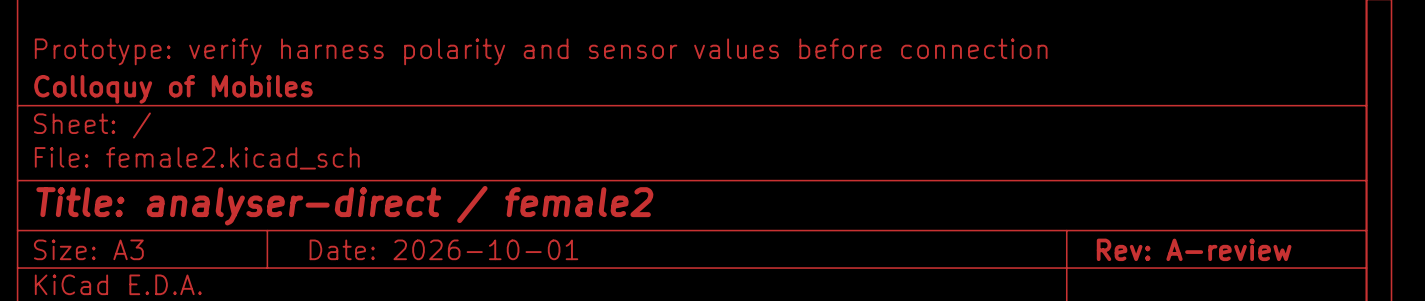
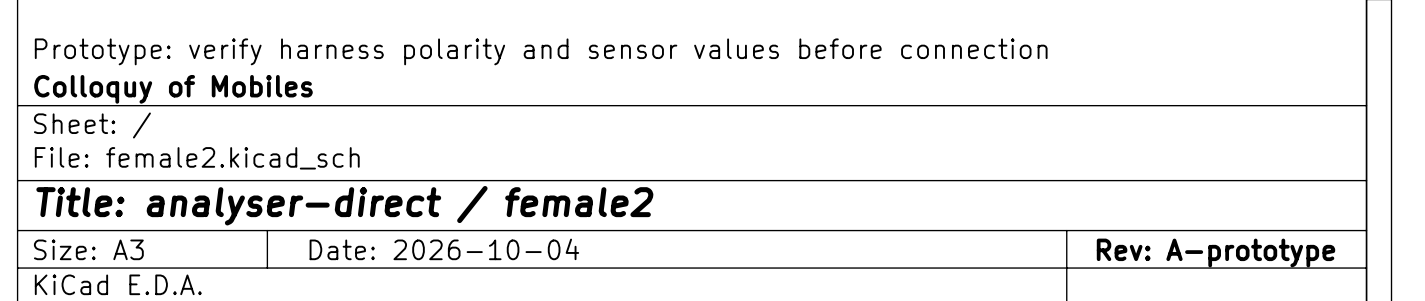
title block: Date: 2026-10-01 (443, 249) -> Date: 2026-10-04 (444, 249)
title block: Rev: A-review (1194, 249) -> Rev: A-prototype (1215, 252)

